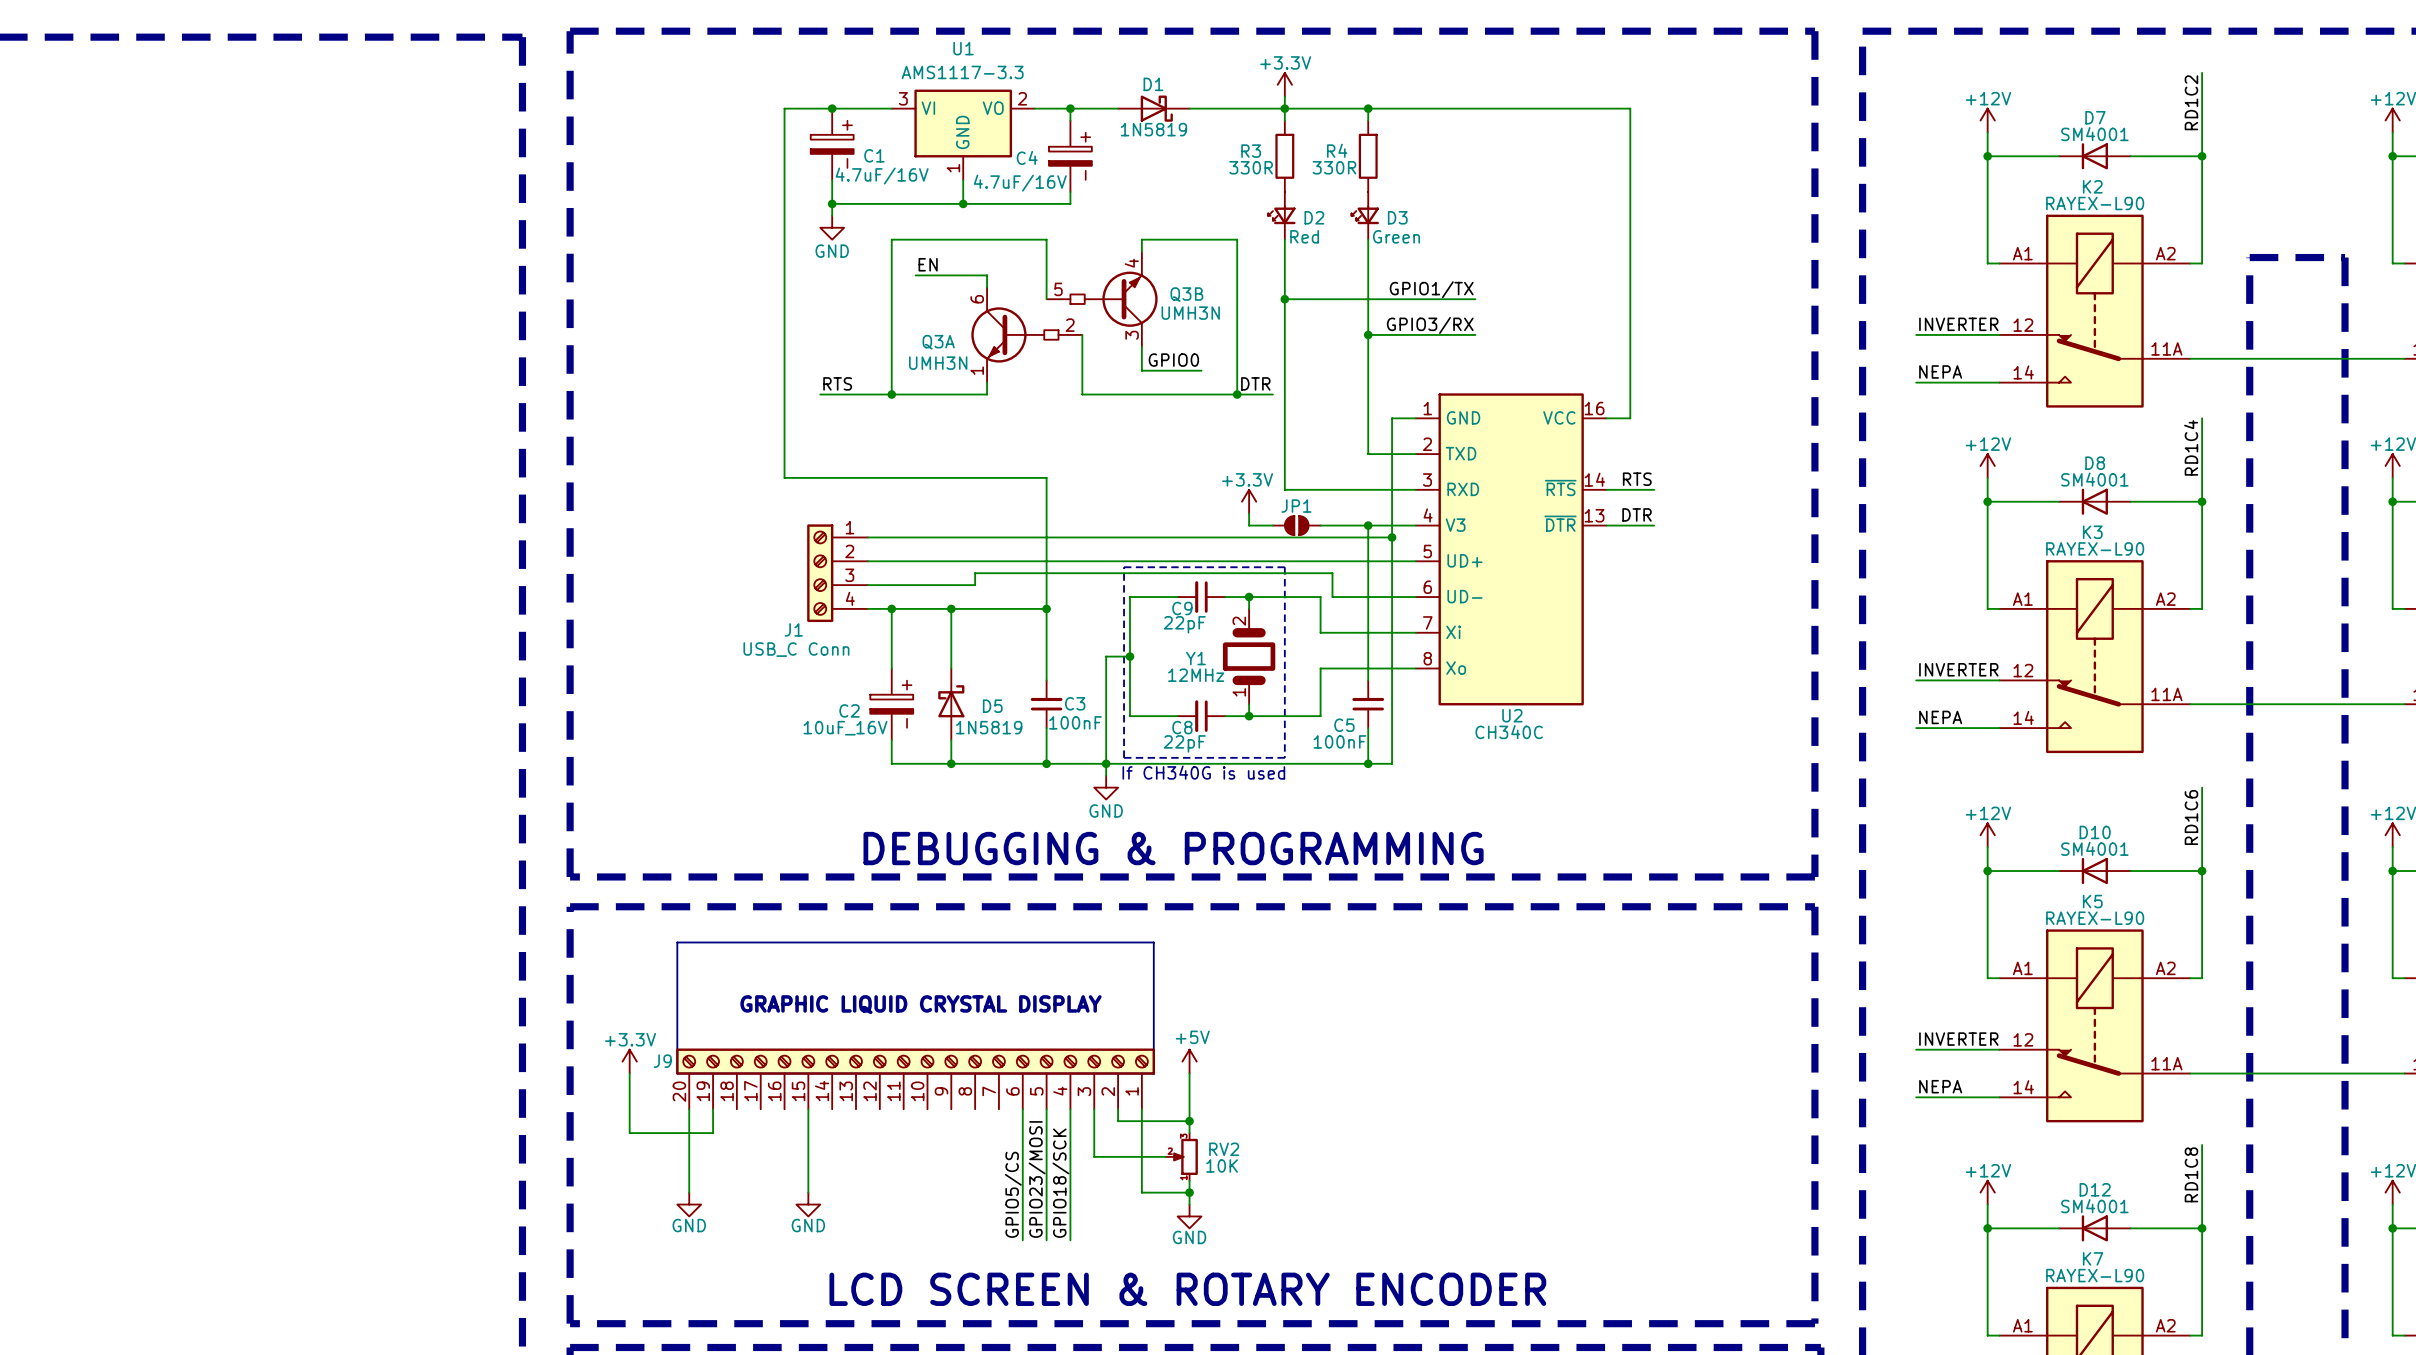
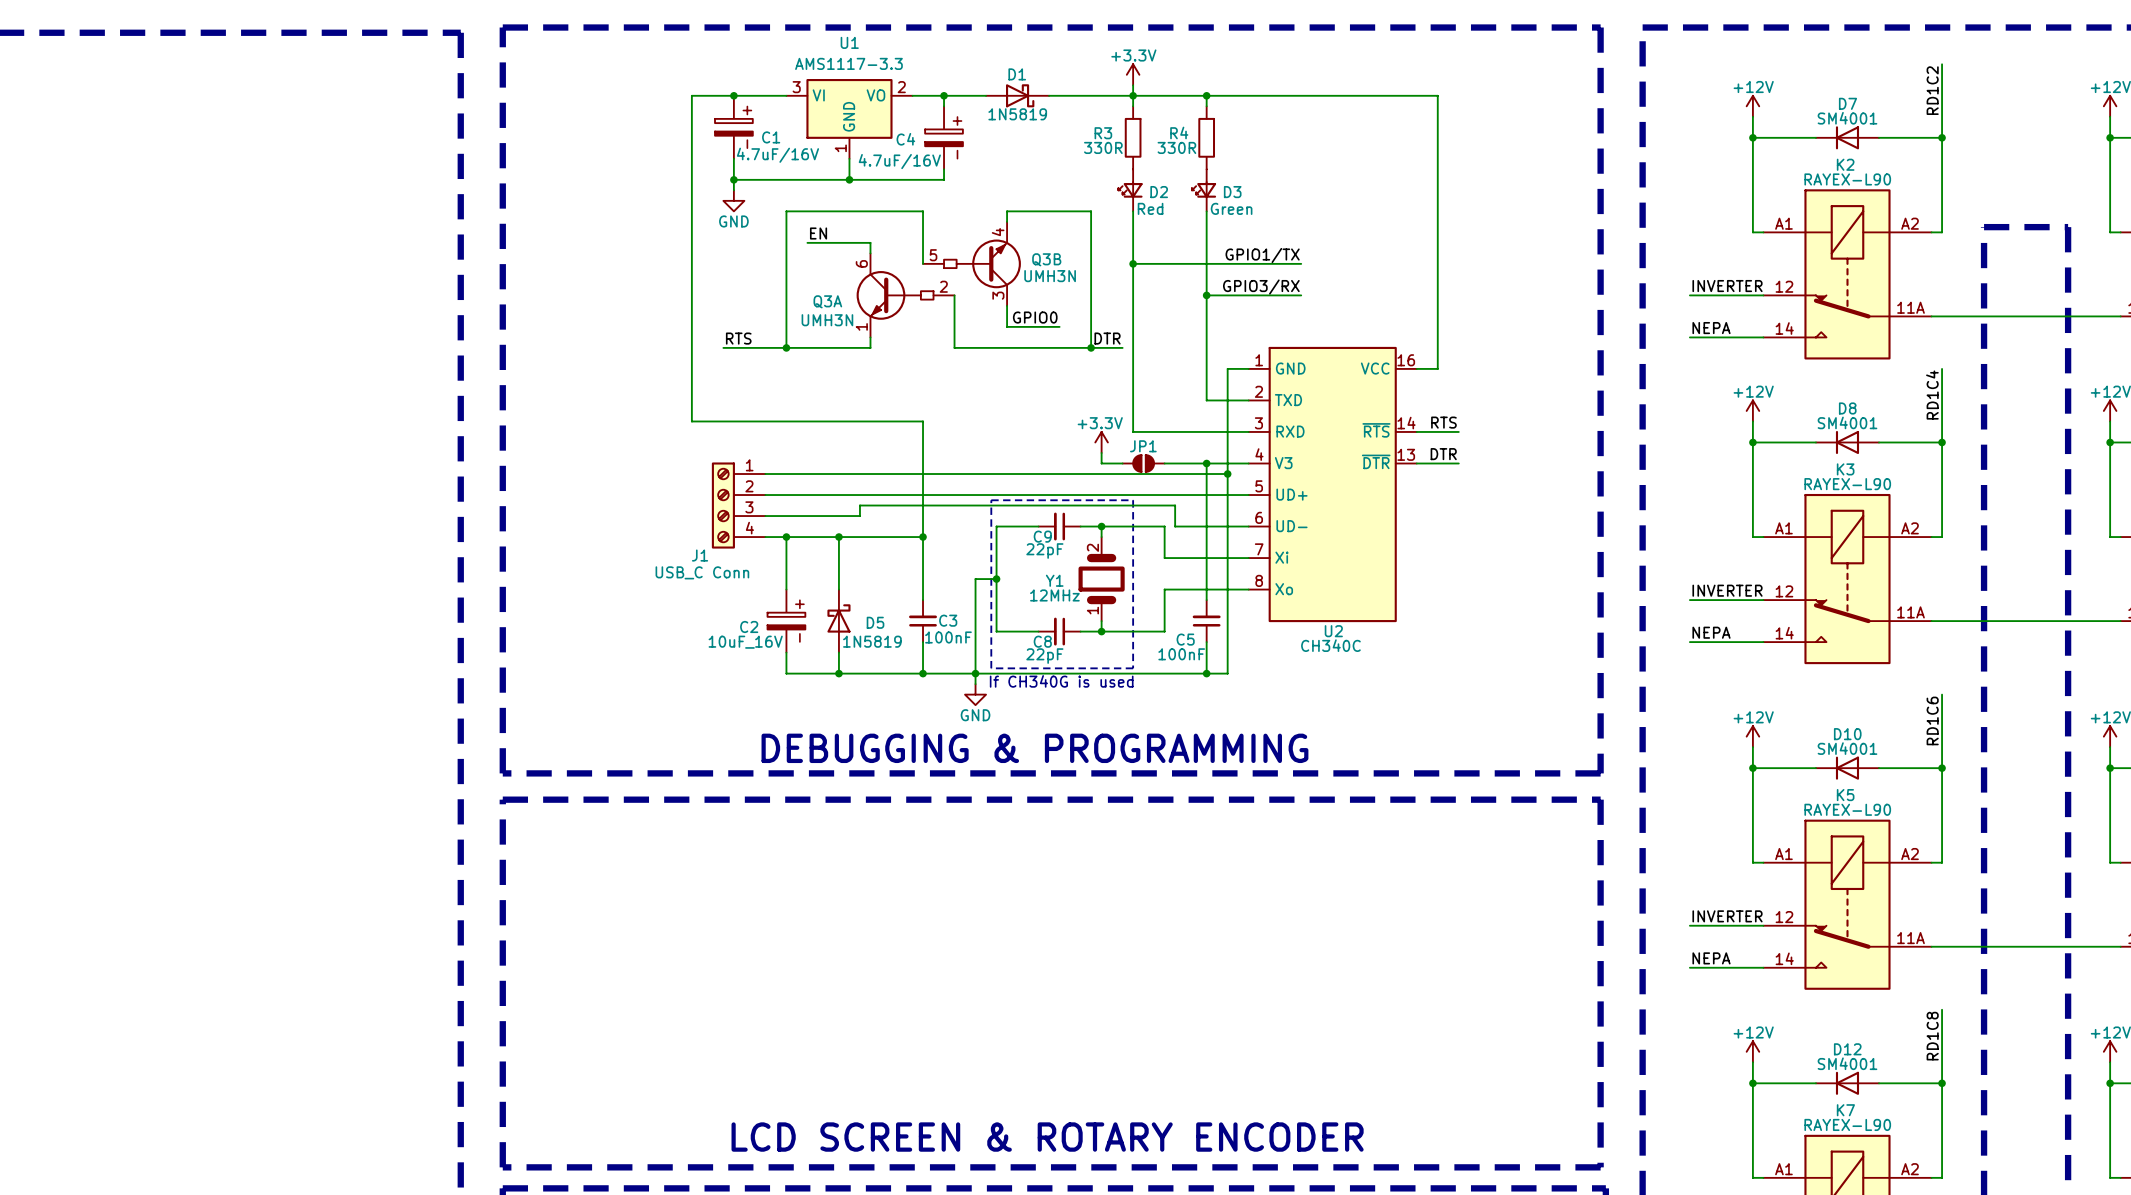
line: (677, 942) (1153, 942) (1153, 1073) (677, 1073) (677, 942) -> none
text: GRAPHIC LIQUID CRYSTAL DISPLAY (921, 1004) -> none
power symbol: +3.3V (629, 1061) -> none
power symbol: +5V (1189, 1061) -> none
wire: (629, 1073) (629, 1133) (713, 1133) (713, 1109) -> none
wire: (1189, 1073) (1189, 1133) -> none
J9: (915, 1078) -> none
wire: (689, 1109) (689, 1192) -> none
wire: (808, 1109) (808, 1192) -> none
wire: (1022, 1109) (1022, 1240) -> none
wire: (1046, 1109) (1046, 1240) -> none
wire: (1070, 1109) (1070, 1240) -> none
wire: (1094, 1109) (1094, 1156) (1165, 1156) -> none
wire: (1118, 1109) (1118, 1121) (1189, 1121) -> none
wire: (1141, 1109) (1141, 1192) (1189, 1192) -> none
junction: (1189, 1121) -> none
RV2: 10K (1181, 1156) -> none
label: GPIO23/MOSI (1037, 1179) -> none
wire: (1189, 1180) (1189, 1204) -> none
label: GPIO18/SCK (1060, 1183) -> none
junction: (1189, 1192) -> none
label: GPIO5/CS (1013, 1194) -> none
power symbol: GND (689, 1204) -> none
power symbol: GND (808, 1204) -> none
power symbol: GND (1189, 1216) -> none

